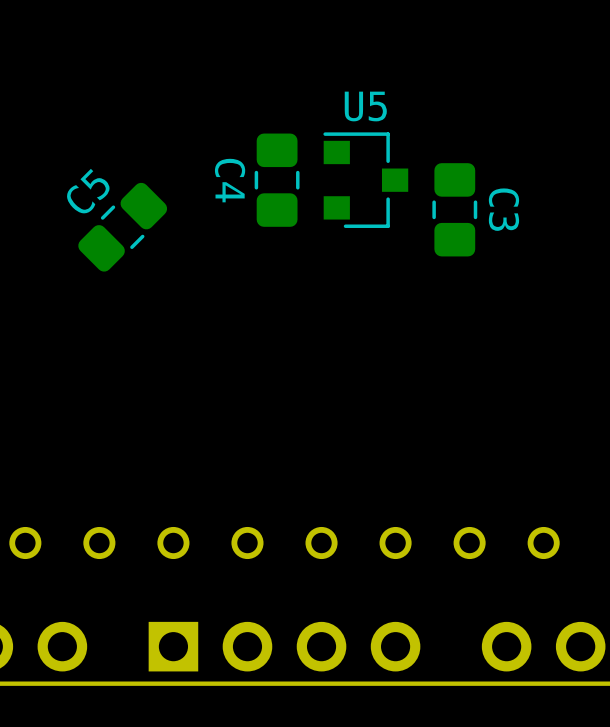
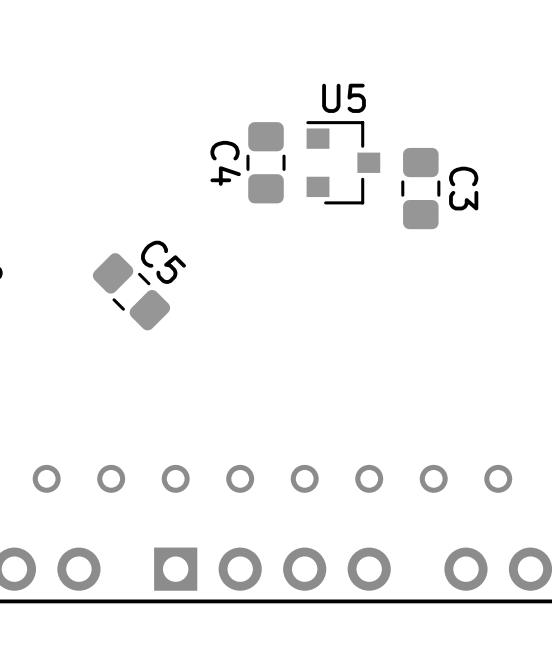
C5 rotation: 0° (122, 227) -> 90° clockwise (131, 291)
C5 position: (122, 227) -> (131, 291)

